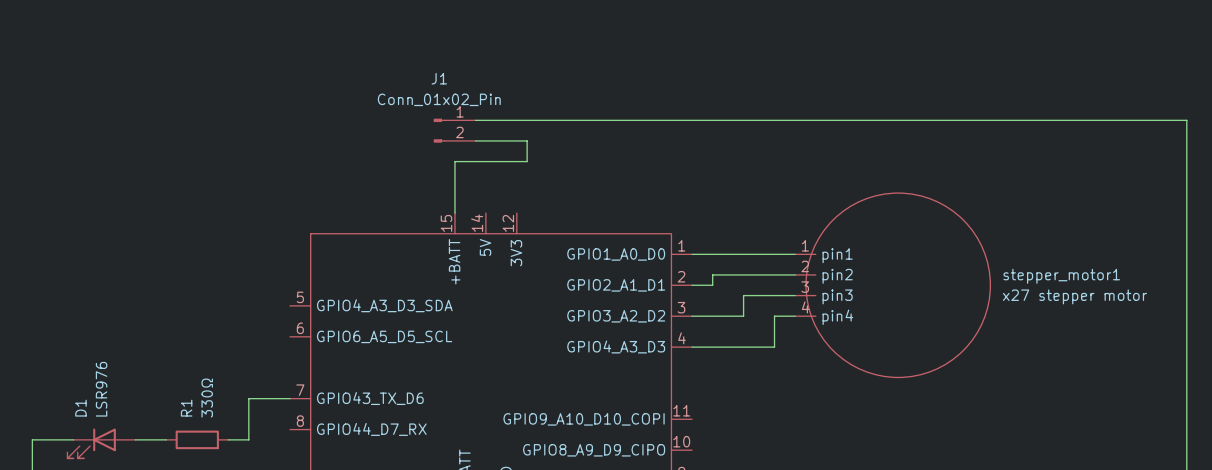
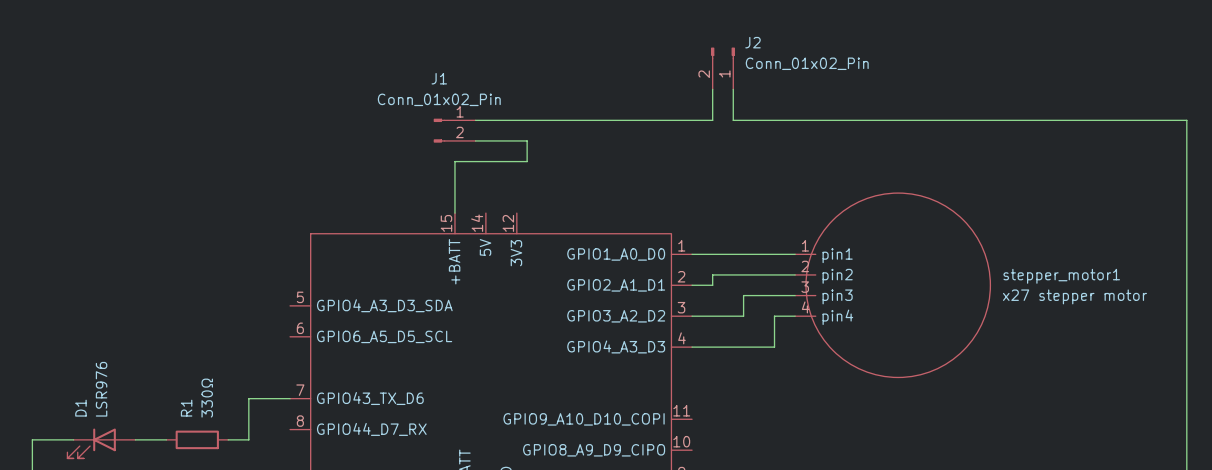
J2: none -> Conn_01x02_Pin (722, 68)
wire: none -> (733, 89) (733, 120)
wire: (712, 120) (733, 120) -> (712, 120) (712, 89)

